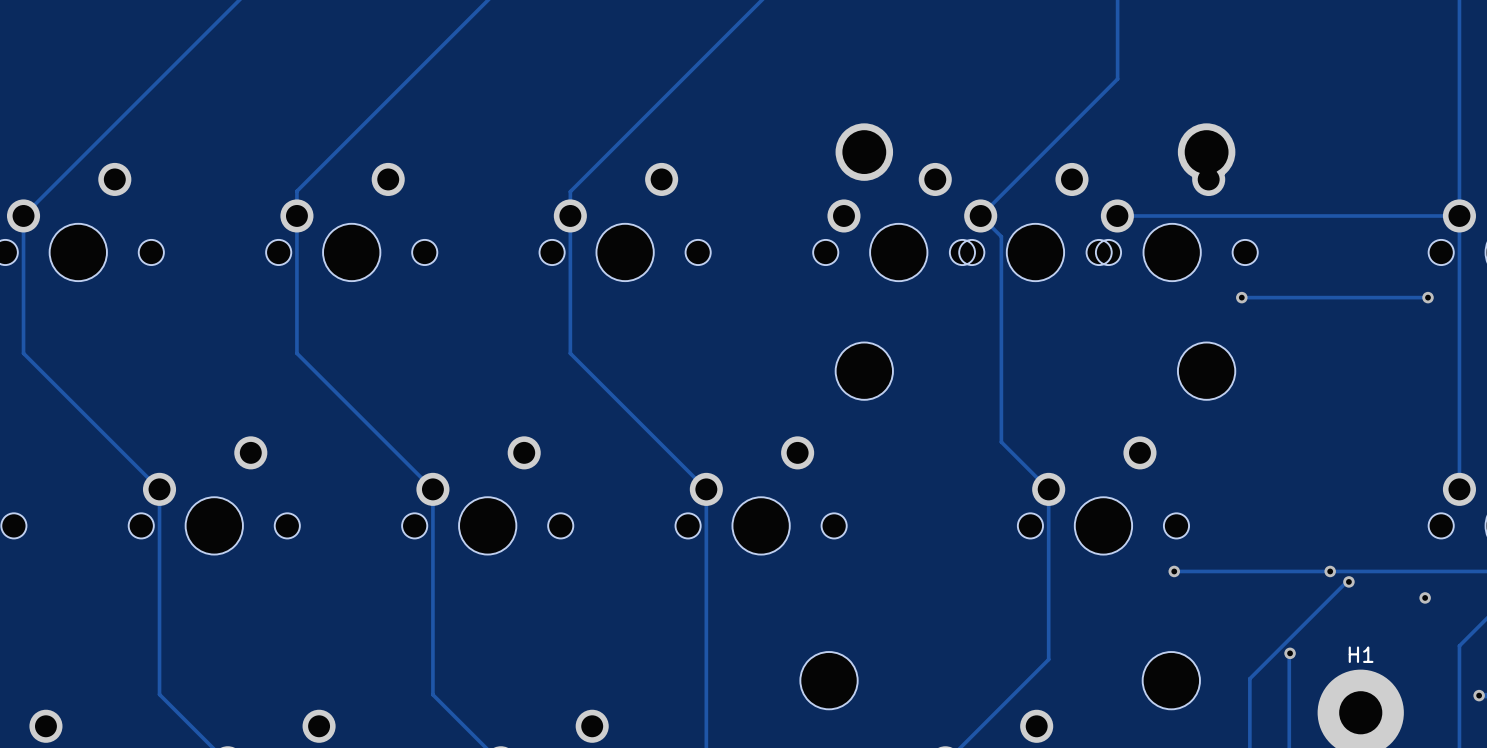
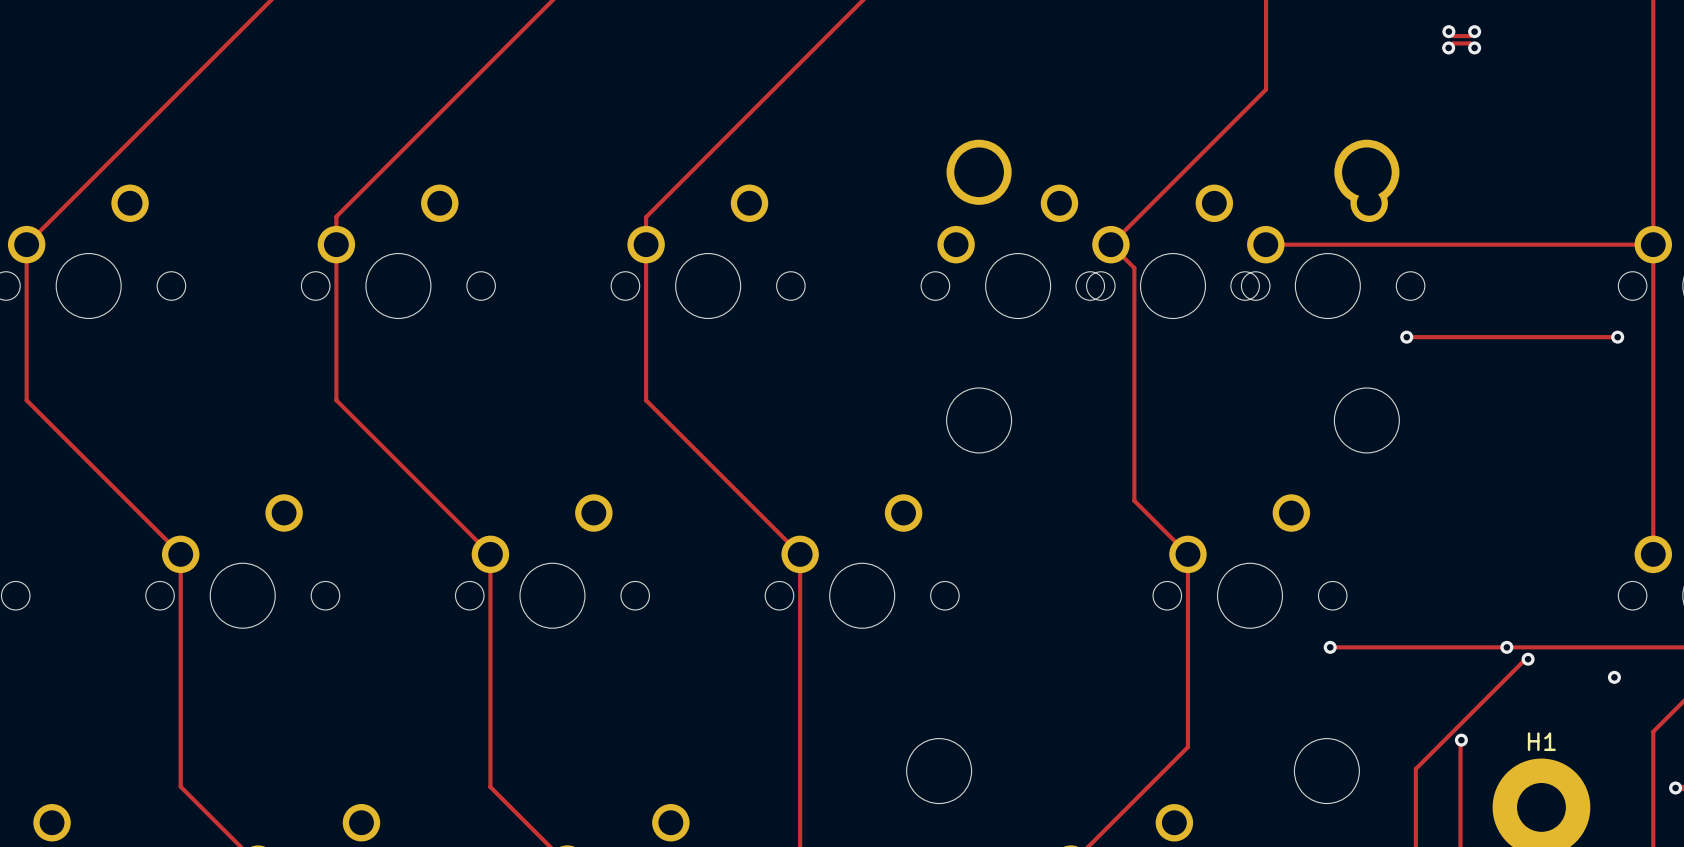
track: none -> (1448, 31) (1453, 36) (1470, 36) (1474, 31)
via: none -> (1448, 31)
via: none -> (1474, 31)
track: none -> (1448, 47) (1453, 43) (1470, 43) (1474, 47)
via: none -> (1448, 47)
via: none -> (1474, 47)

